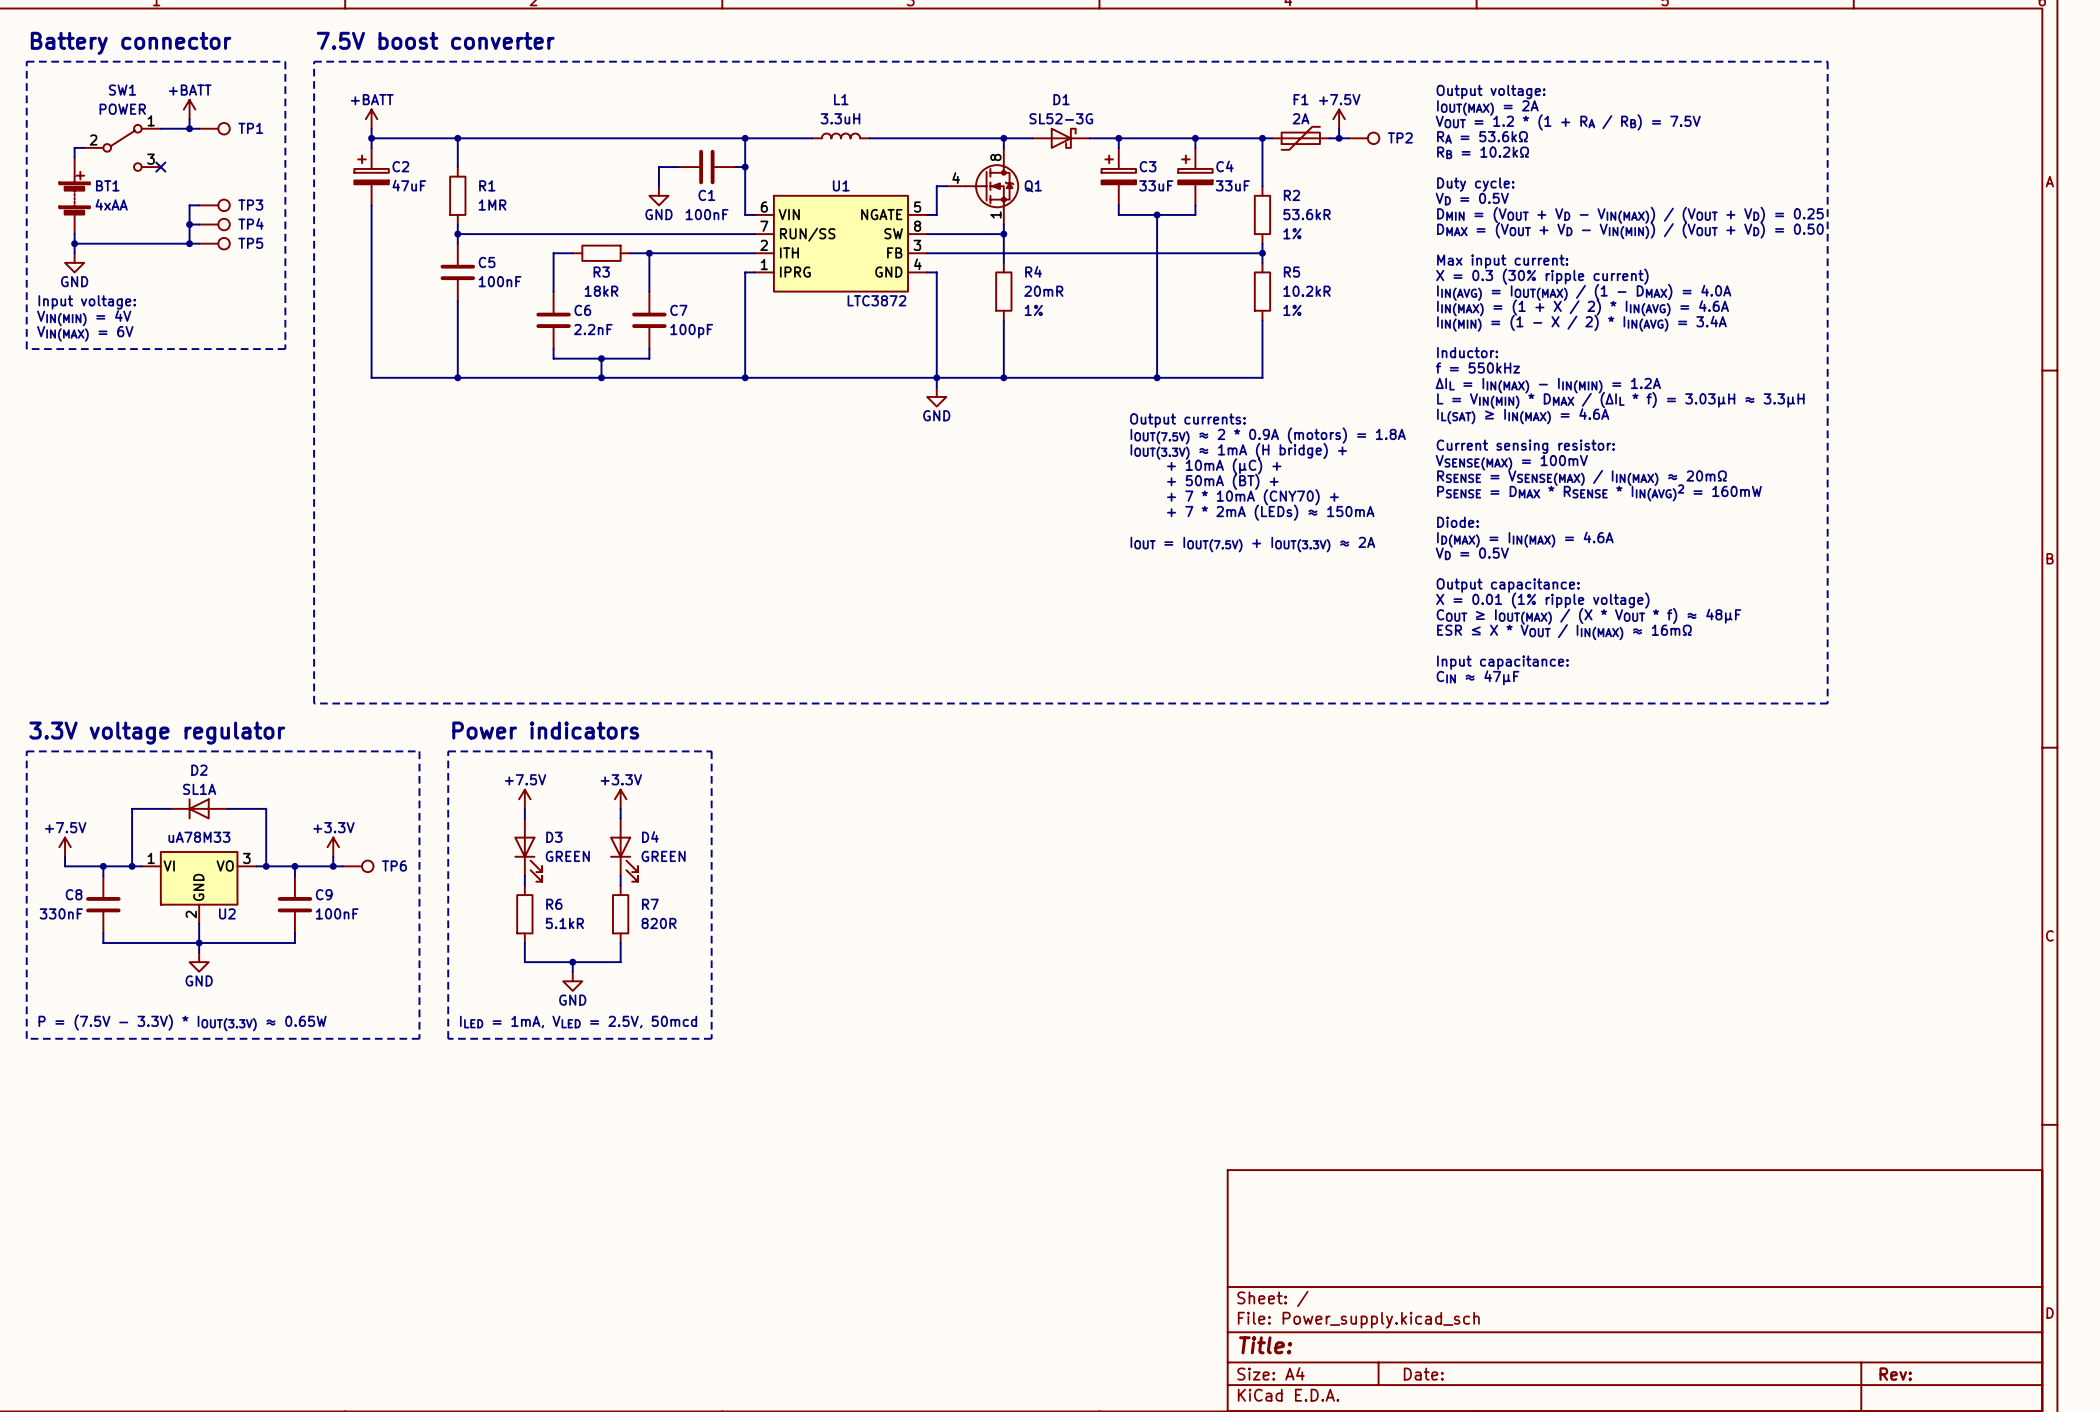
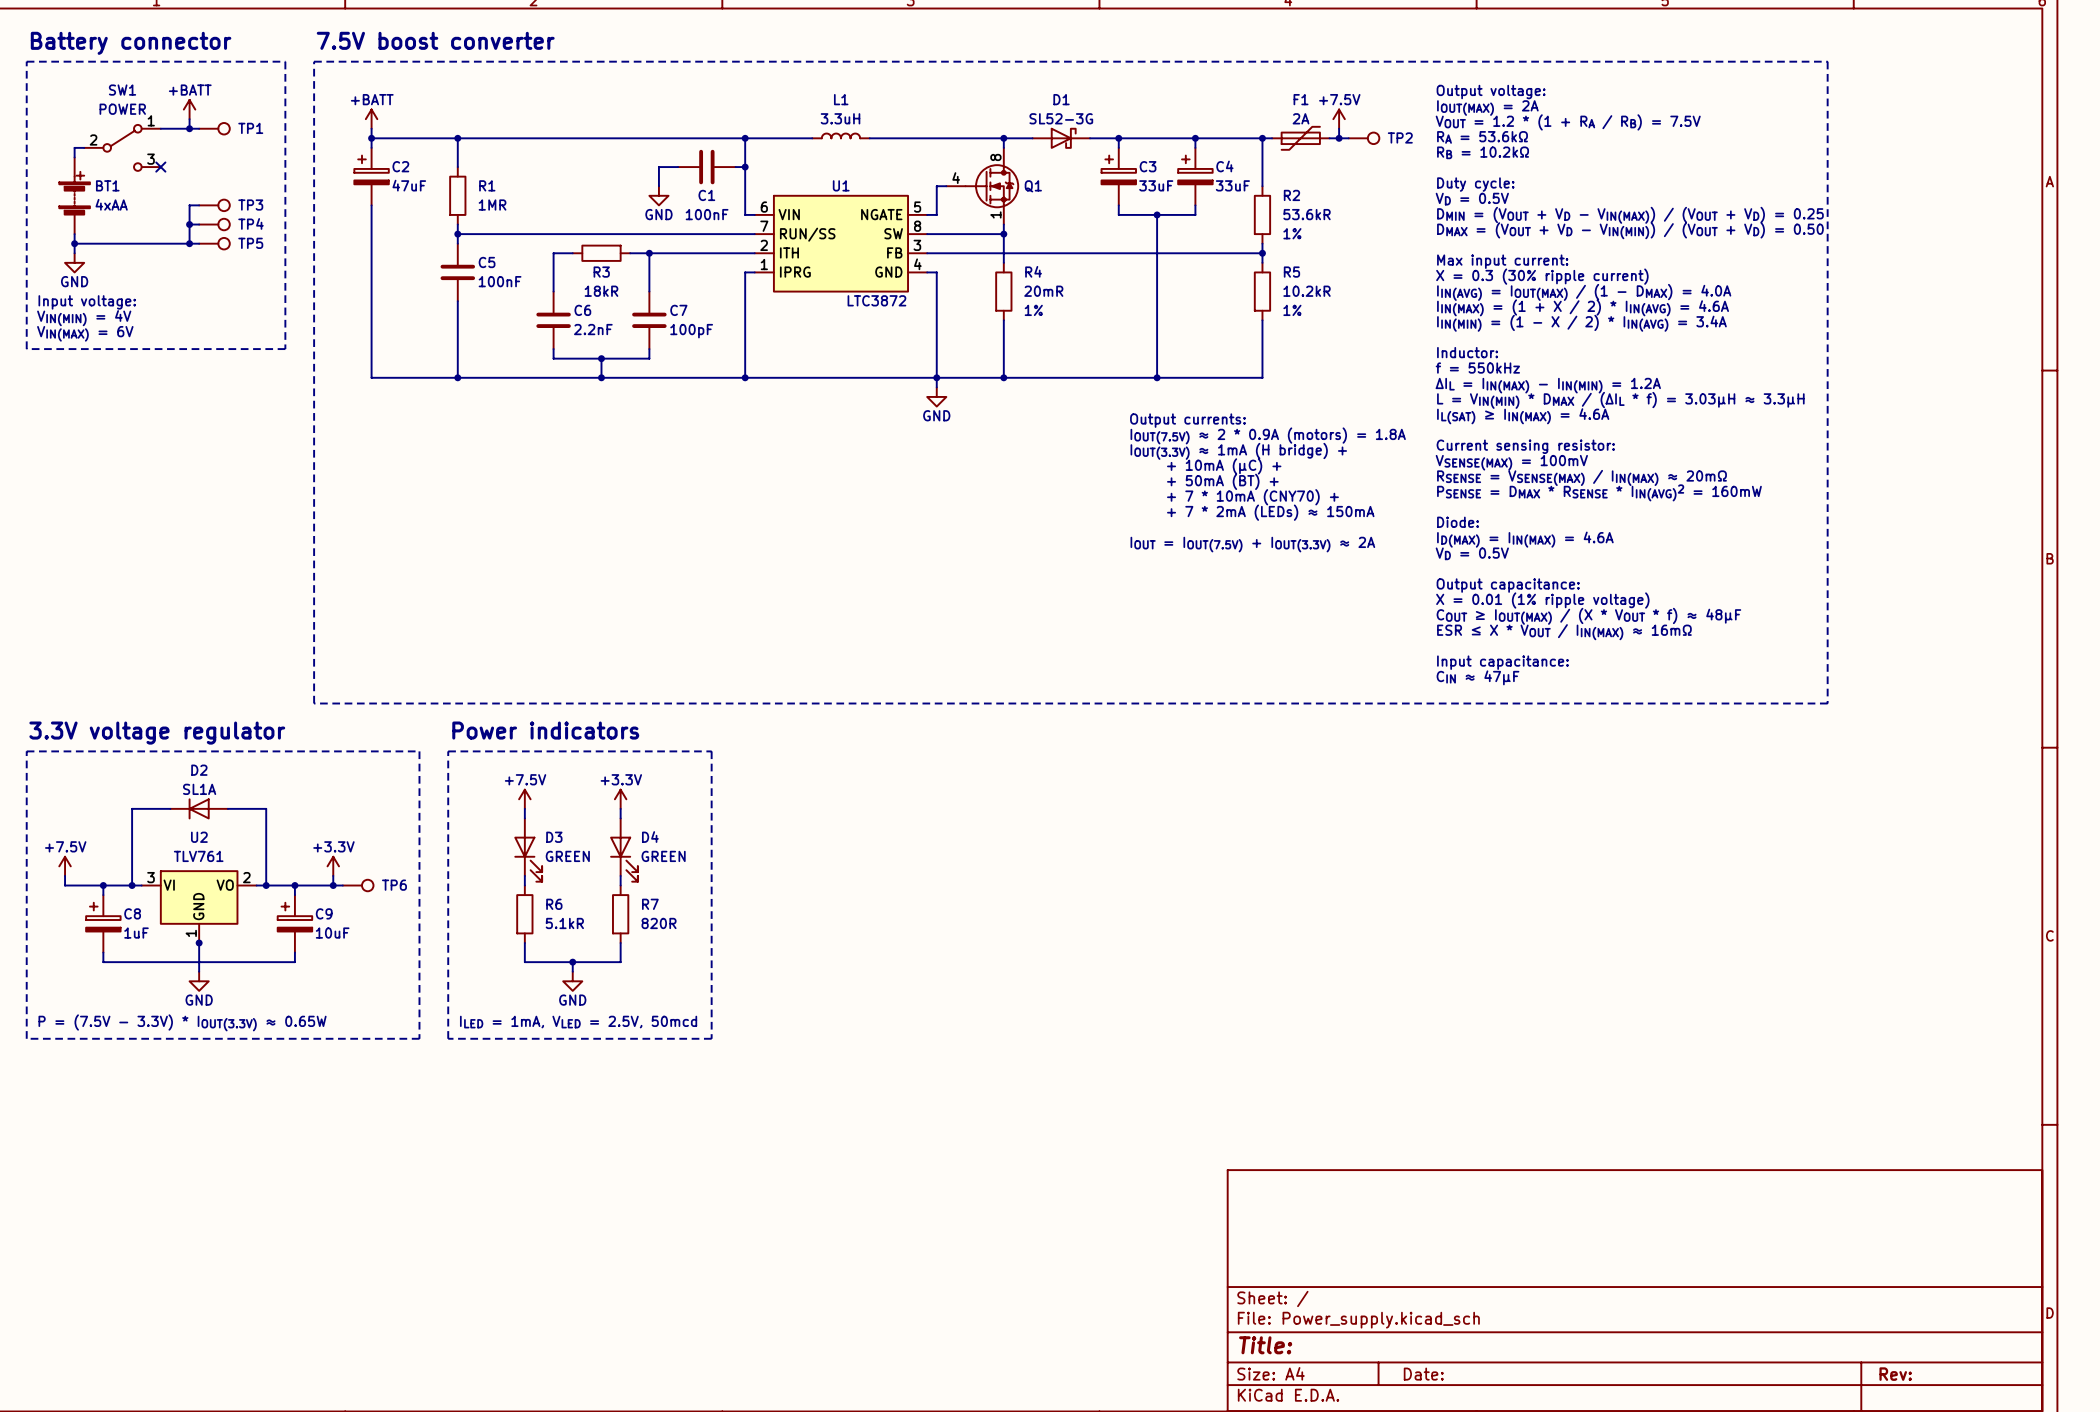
U2 value: uA78M33 (199, 837) -> TLV761 (198, 856)
power symbol position: +7.5V (65, 847) -> +7.5V (65, 866)
power symbol position: +3.3V (333, 847) -> +3.3V (333, 866)
wire: (65, 856) (65, 866) (141, 866) -> (65, 875) (65, 885) (141, 885)
U2 pin number: 1 (151, 858) -> 3 (151, 877)
U2 pin number: 3 (246, 858) -> 2 (246, 877)
junction: (103, 866) -> none
wire: none -> (132, 866) (132, 885)
junction: (132, 866) -> none
wire: (256, 866) (342, 866) -> (256, 885) (342, 885)
wire: none -> (266, 866) (266, 885)
junction: (266, 866) -> none
junction: (294, 866) -> none
junction position: (333, 866) -> (333, 885)
TP6 position: (358, 866) -> (358, 885)
C8 symbol: [86, 875, 121, 934] -> [86, 895, 121, 953]
C9 symbol: [277, 875, 313, 934] -> [277, 895, 313, 953]
junction: none -> (103, 885)
junction: none -> (132, 885)
junction: none -> (266, 885)
junction: none -> (294, 885)
U2 position: (199, 887) -> (199, 906)
C8 name position: C8 (74, 894) -> C8 (132, 913)
C8 value: 330nF (61, 913) -> 1uF (136, 933)
U2 name position: U2 (227, 913) -> U2 (199, 837)
C9 value: 100nF (337, 913) -> 10uF (332, 933)
U2 pin number: 2 (191, 914) -> 1 (191, 933)
wire: (103, 933) (103, 942) (294, 942) (294, 933) -> (103, 952) (103, 962) (294, 962) (294, 952)
power symbol position: GND (199, 962) -> GND (199, 981)

